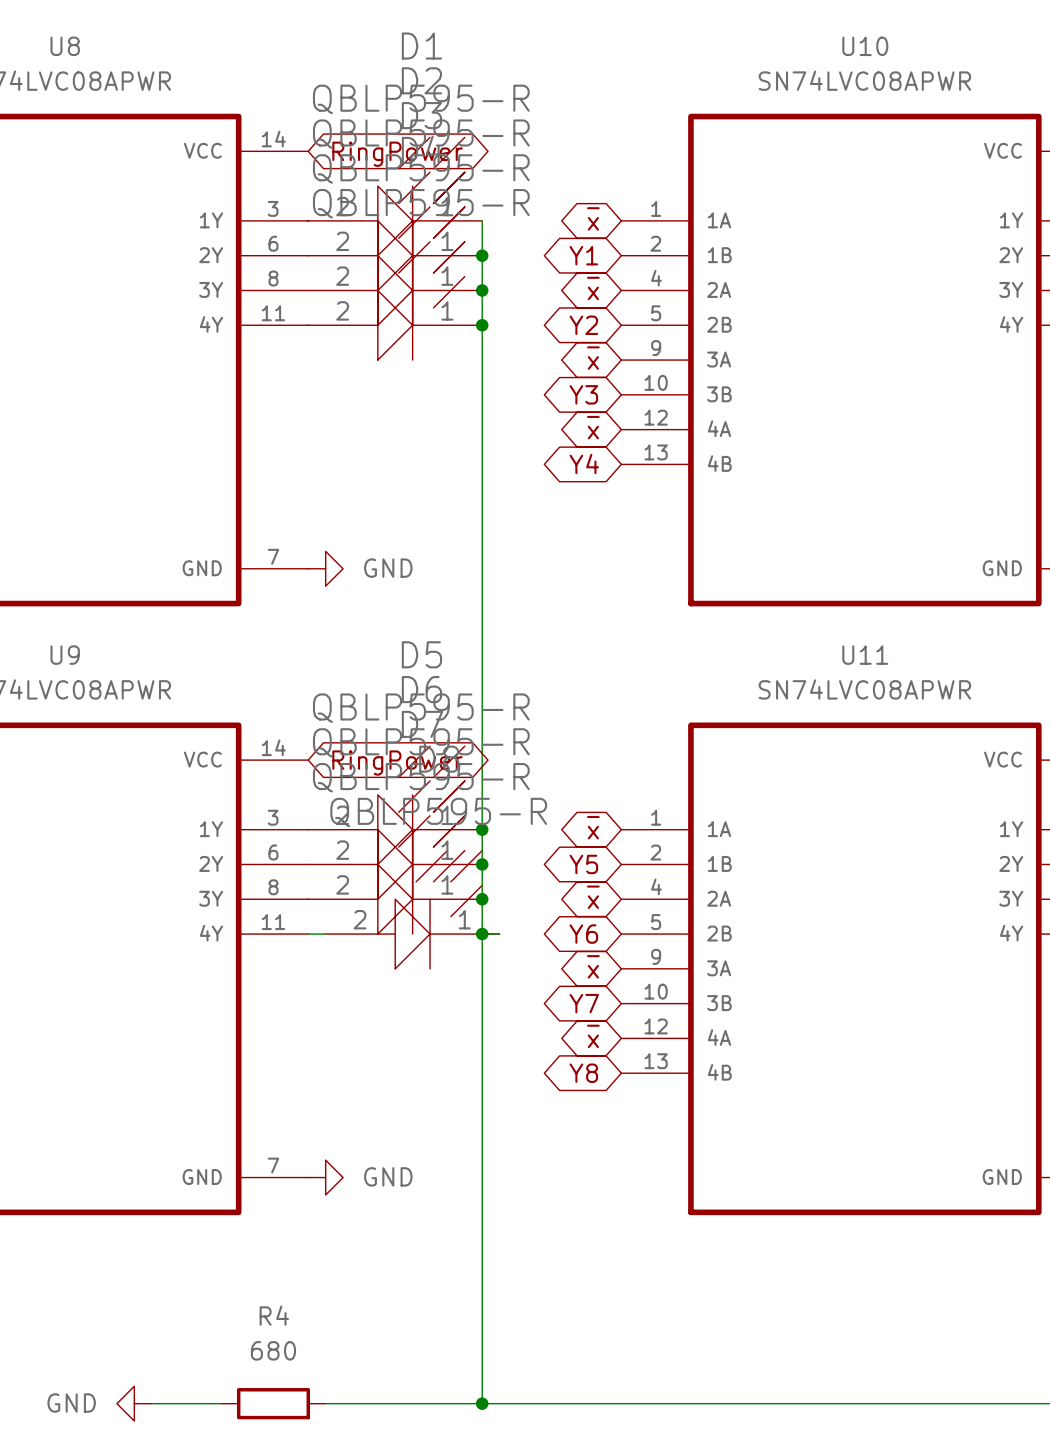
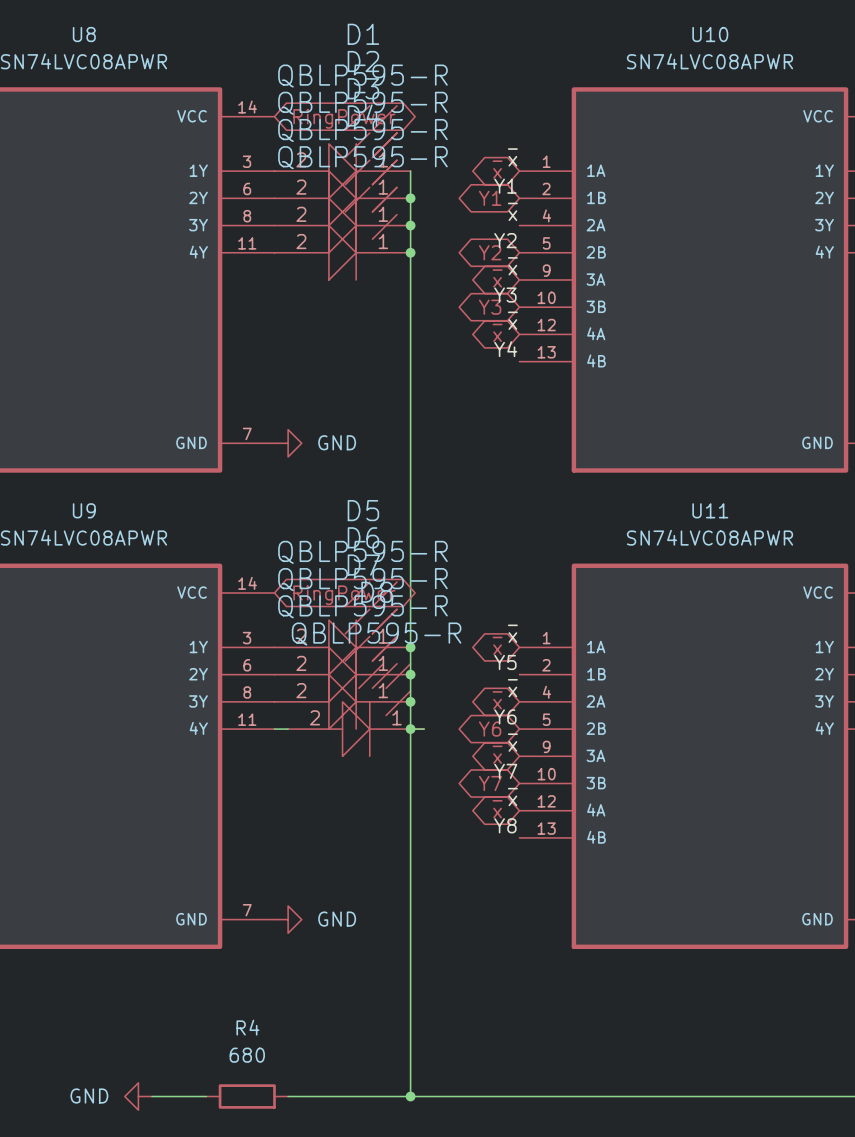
label: none -> ~{x} (512, 157)
label: none -> Y1 (505, 186)
label: none -> ~{x} (512, 211)
global label: ~{x} (593, 288) -> none
label: none -> Y2 (505, 240)
label: none -> ~{x} (512, 266)
label: none -> Y3 (505, 295)
label: none -> ~{x} (512, 320)
label: none -> Y4 (505, 349)
global label: Y4 (584, 463) -> none
label: none -> ~{x} (512, 633)
label: none -> Y5 (505, 662)
global label: Y5 (583, 864) -> none
label: none -> ~{x} (512, 688)
label: none -> Y6 (505, 716)
label: none -> ~{x} (512, 742)
label: none -> Y7 (505, 771)
label: none -> ~{x} (512, 797)
label: none -> Y8 (505, 825)
global label: Y8 (583, 1073) -> none

